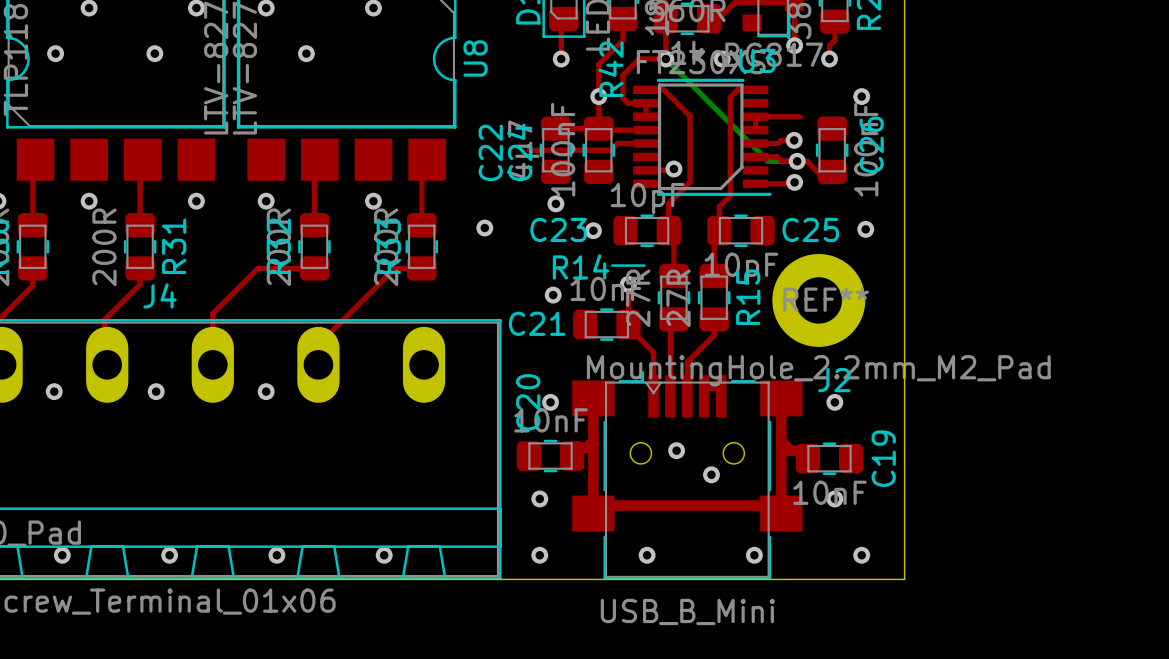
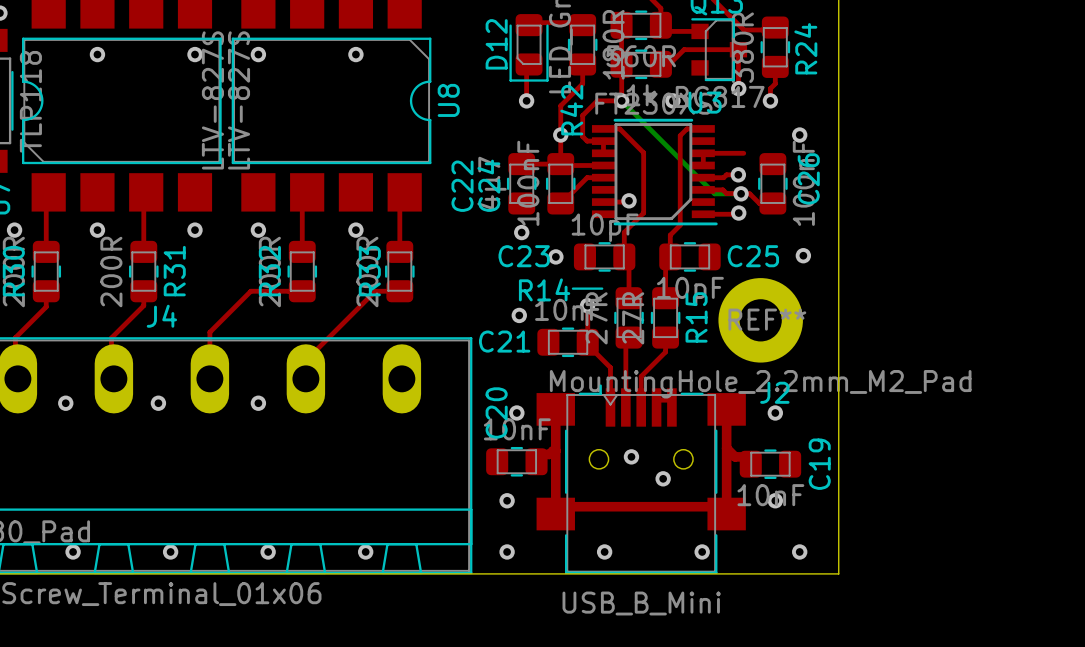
via: (55, 53) -> none
via: (154, 53) -> none
via: (306, 53) -> none
top track: (627, 143) (617, 143) (610, 150) (529, 150) -> (587, 177) (561, 203)
via: (484, 228) -> none

